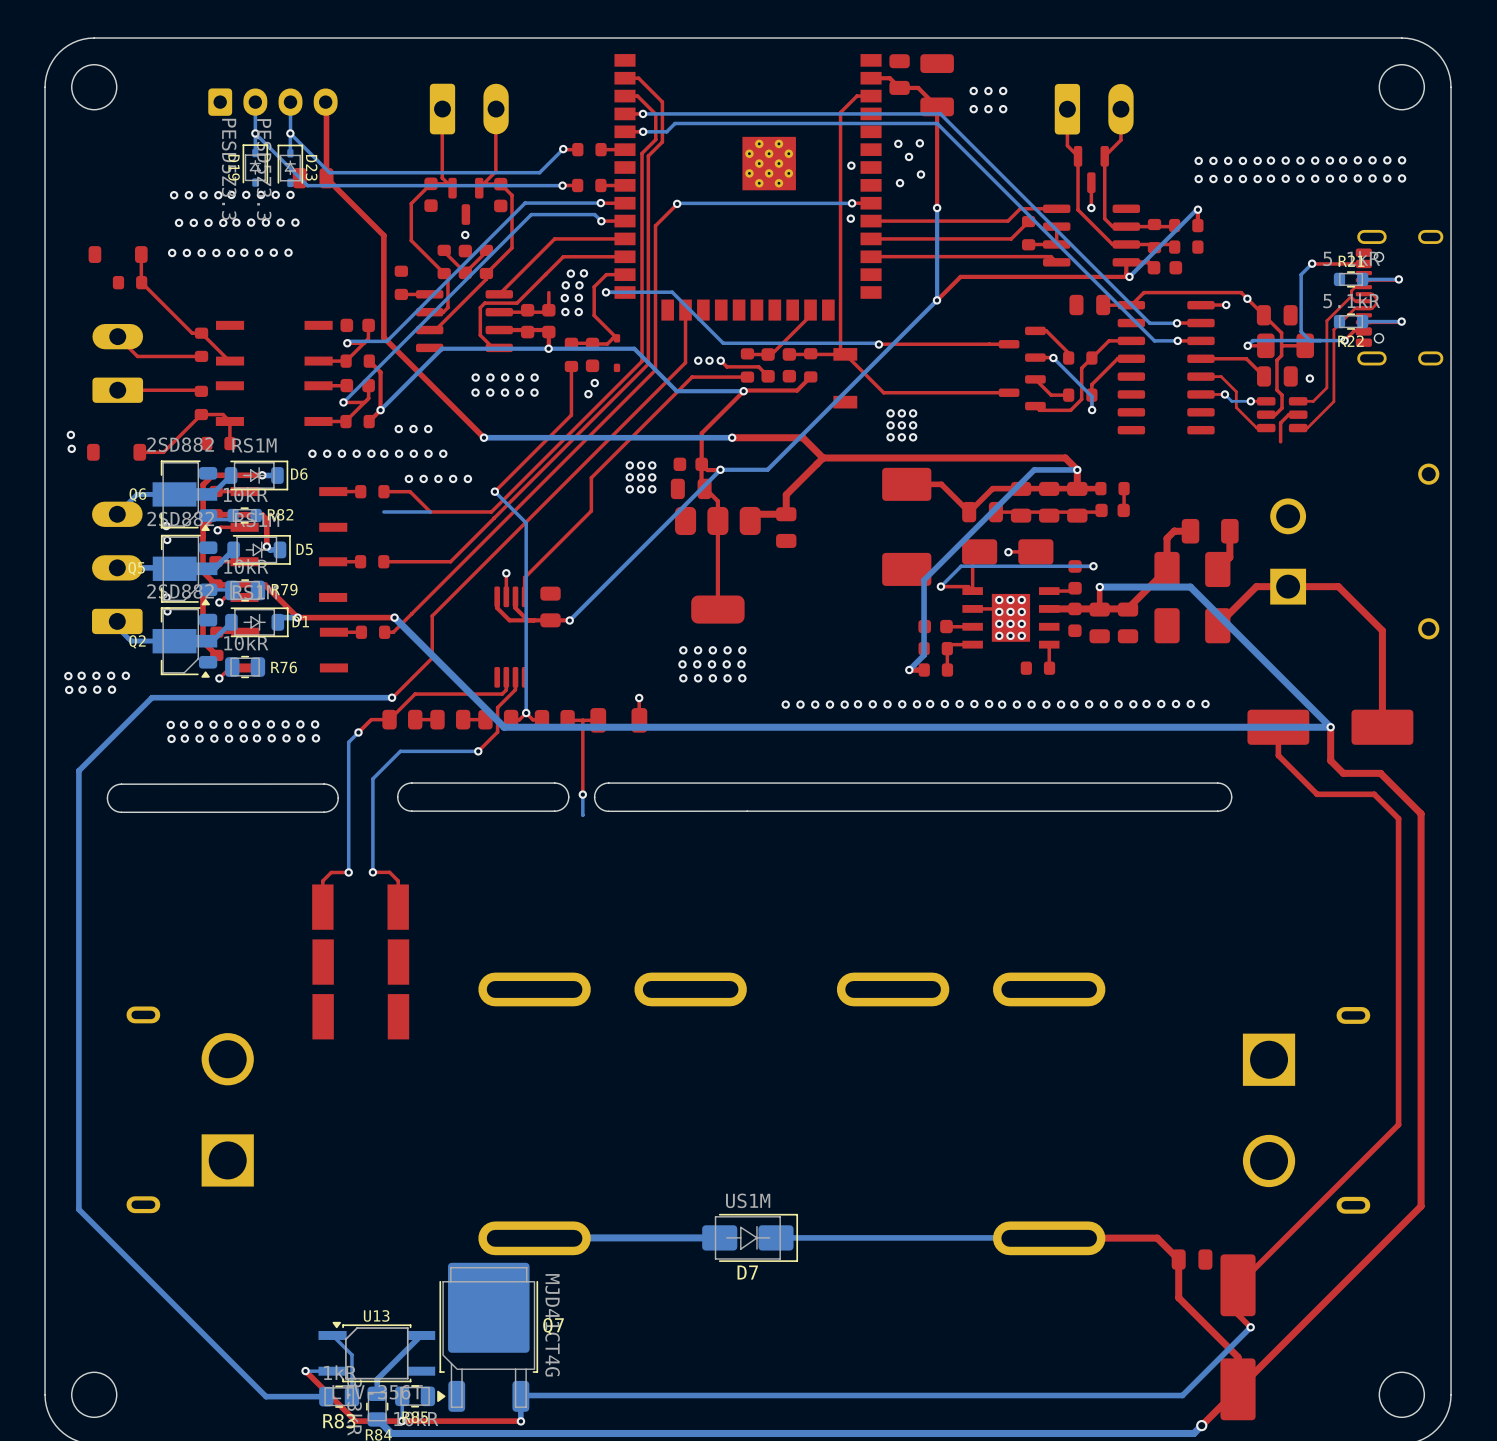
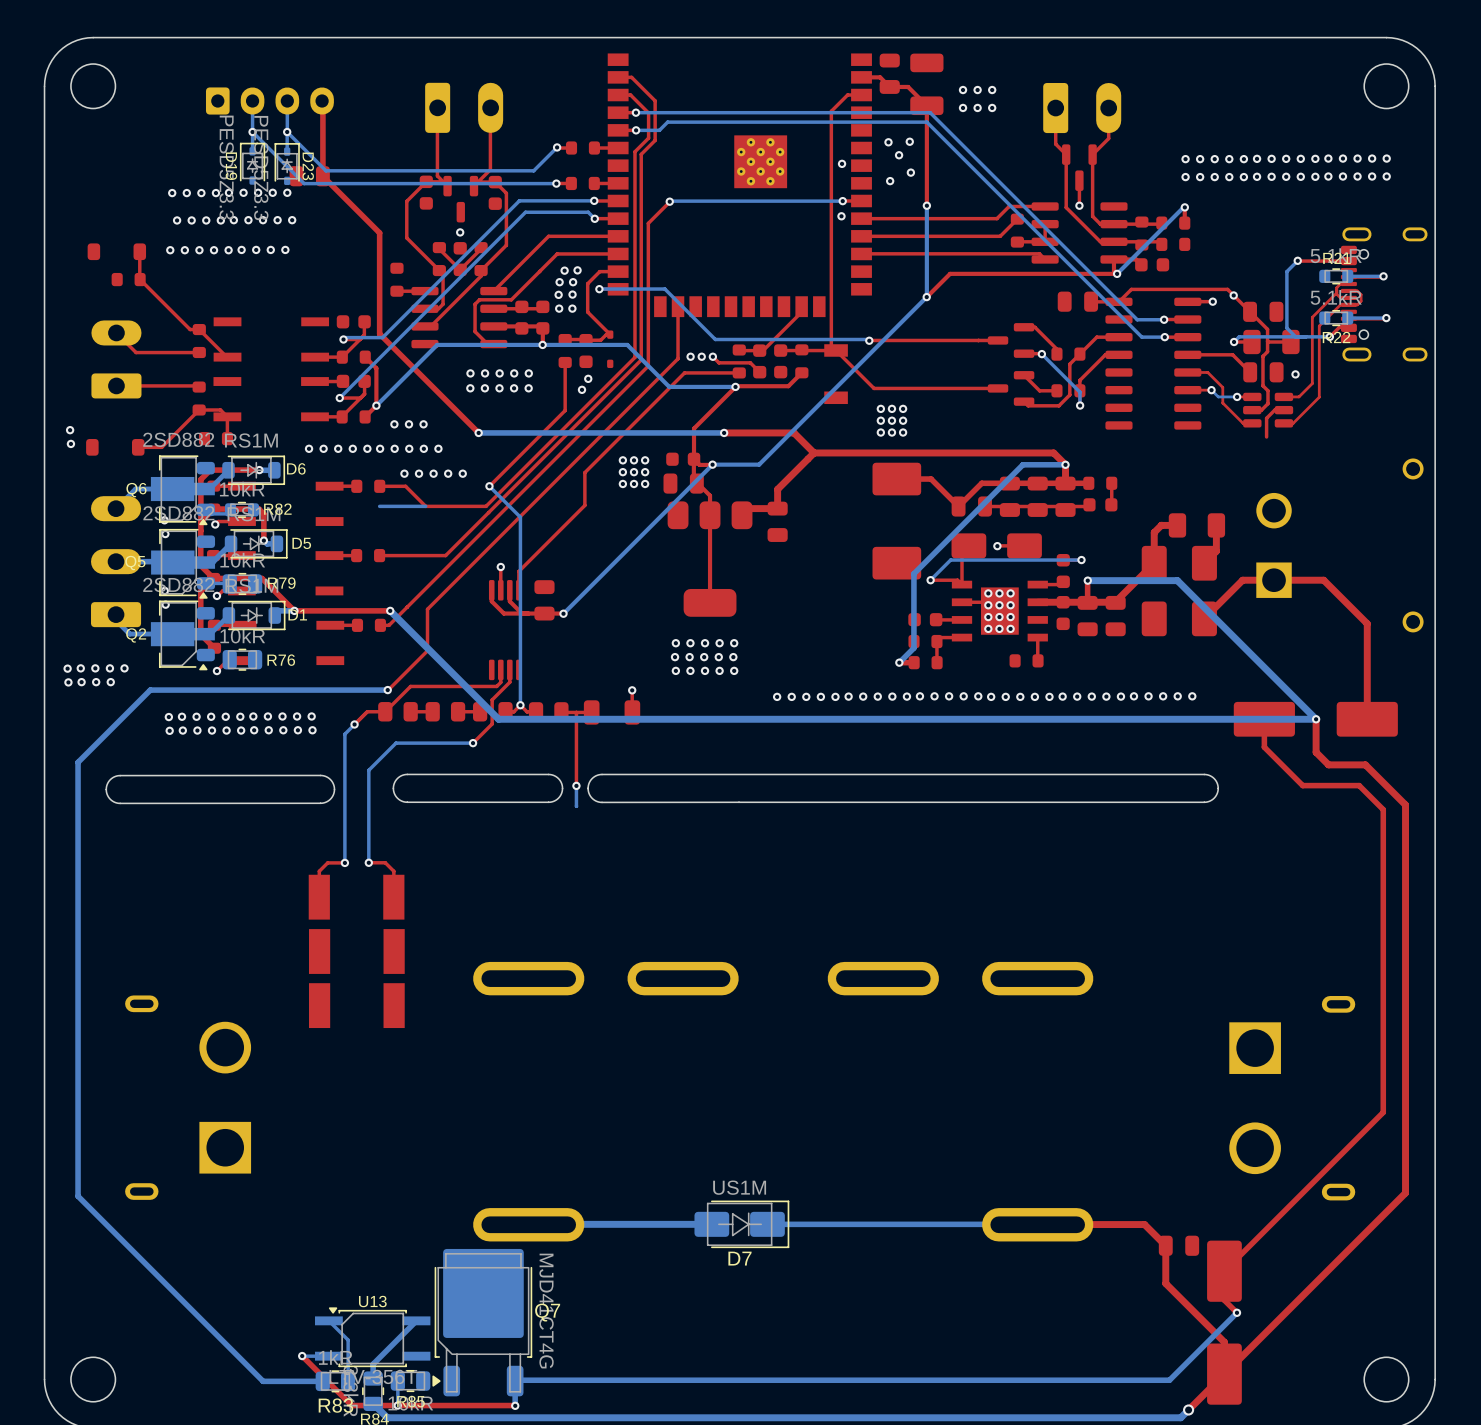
top track: (548, 292) (548, 310) -> none

